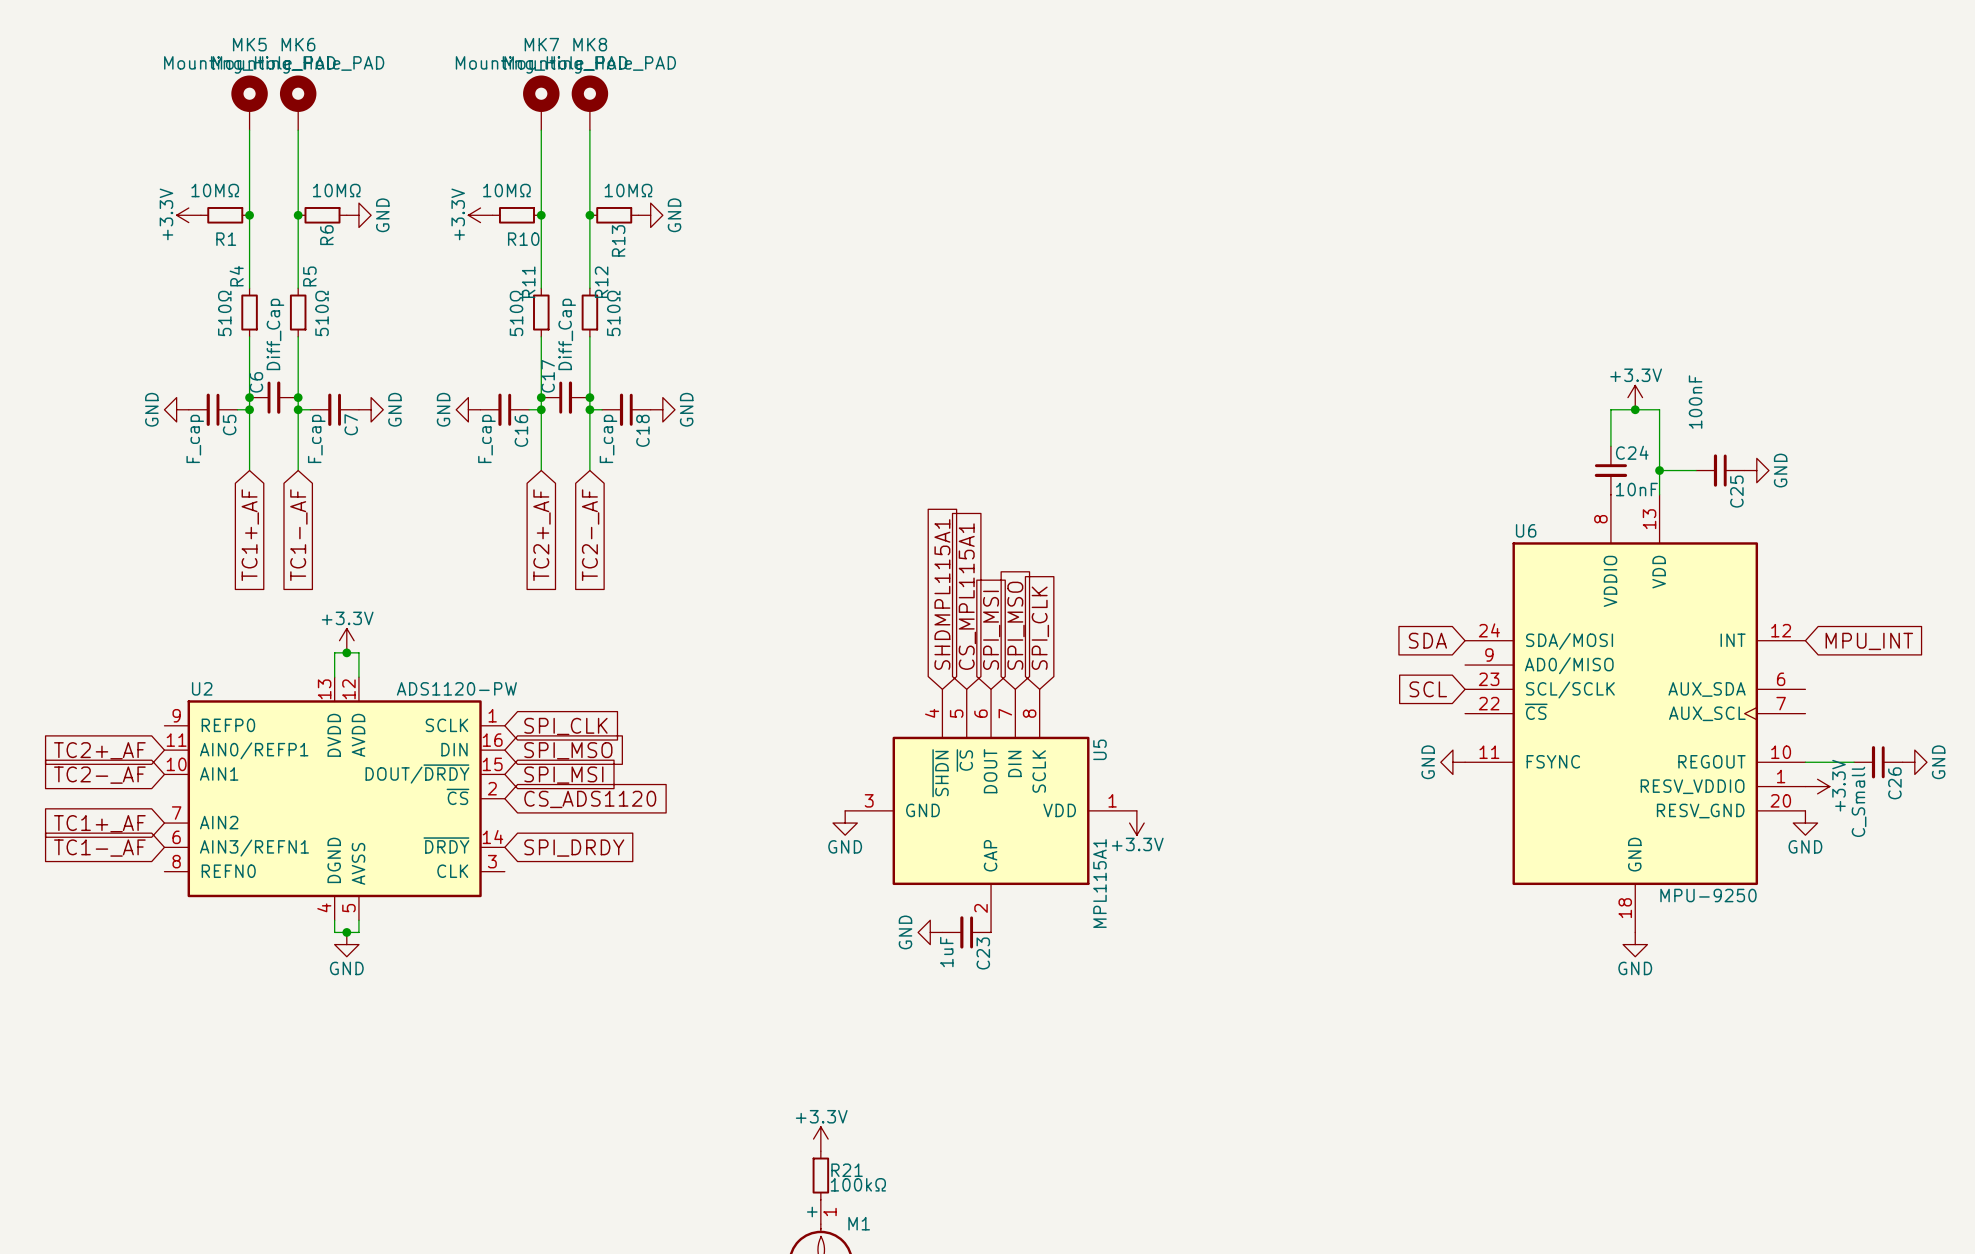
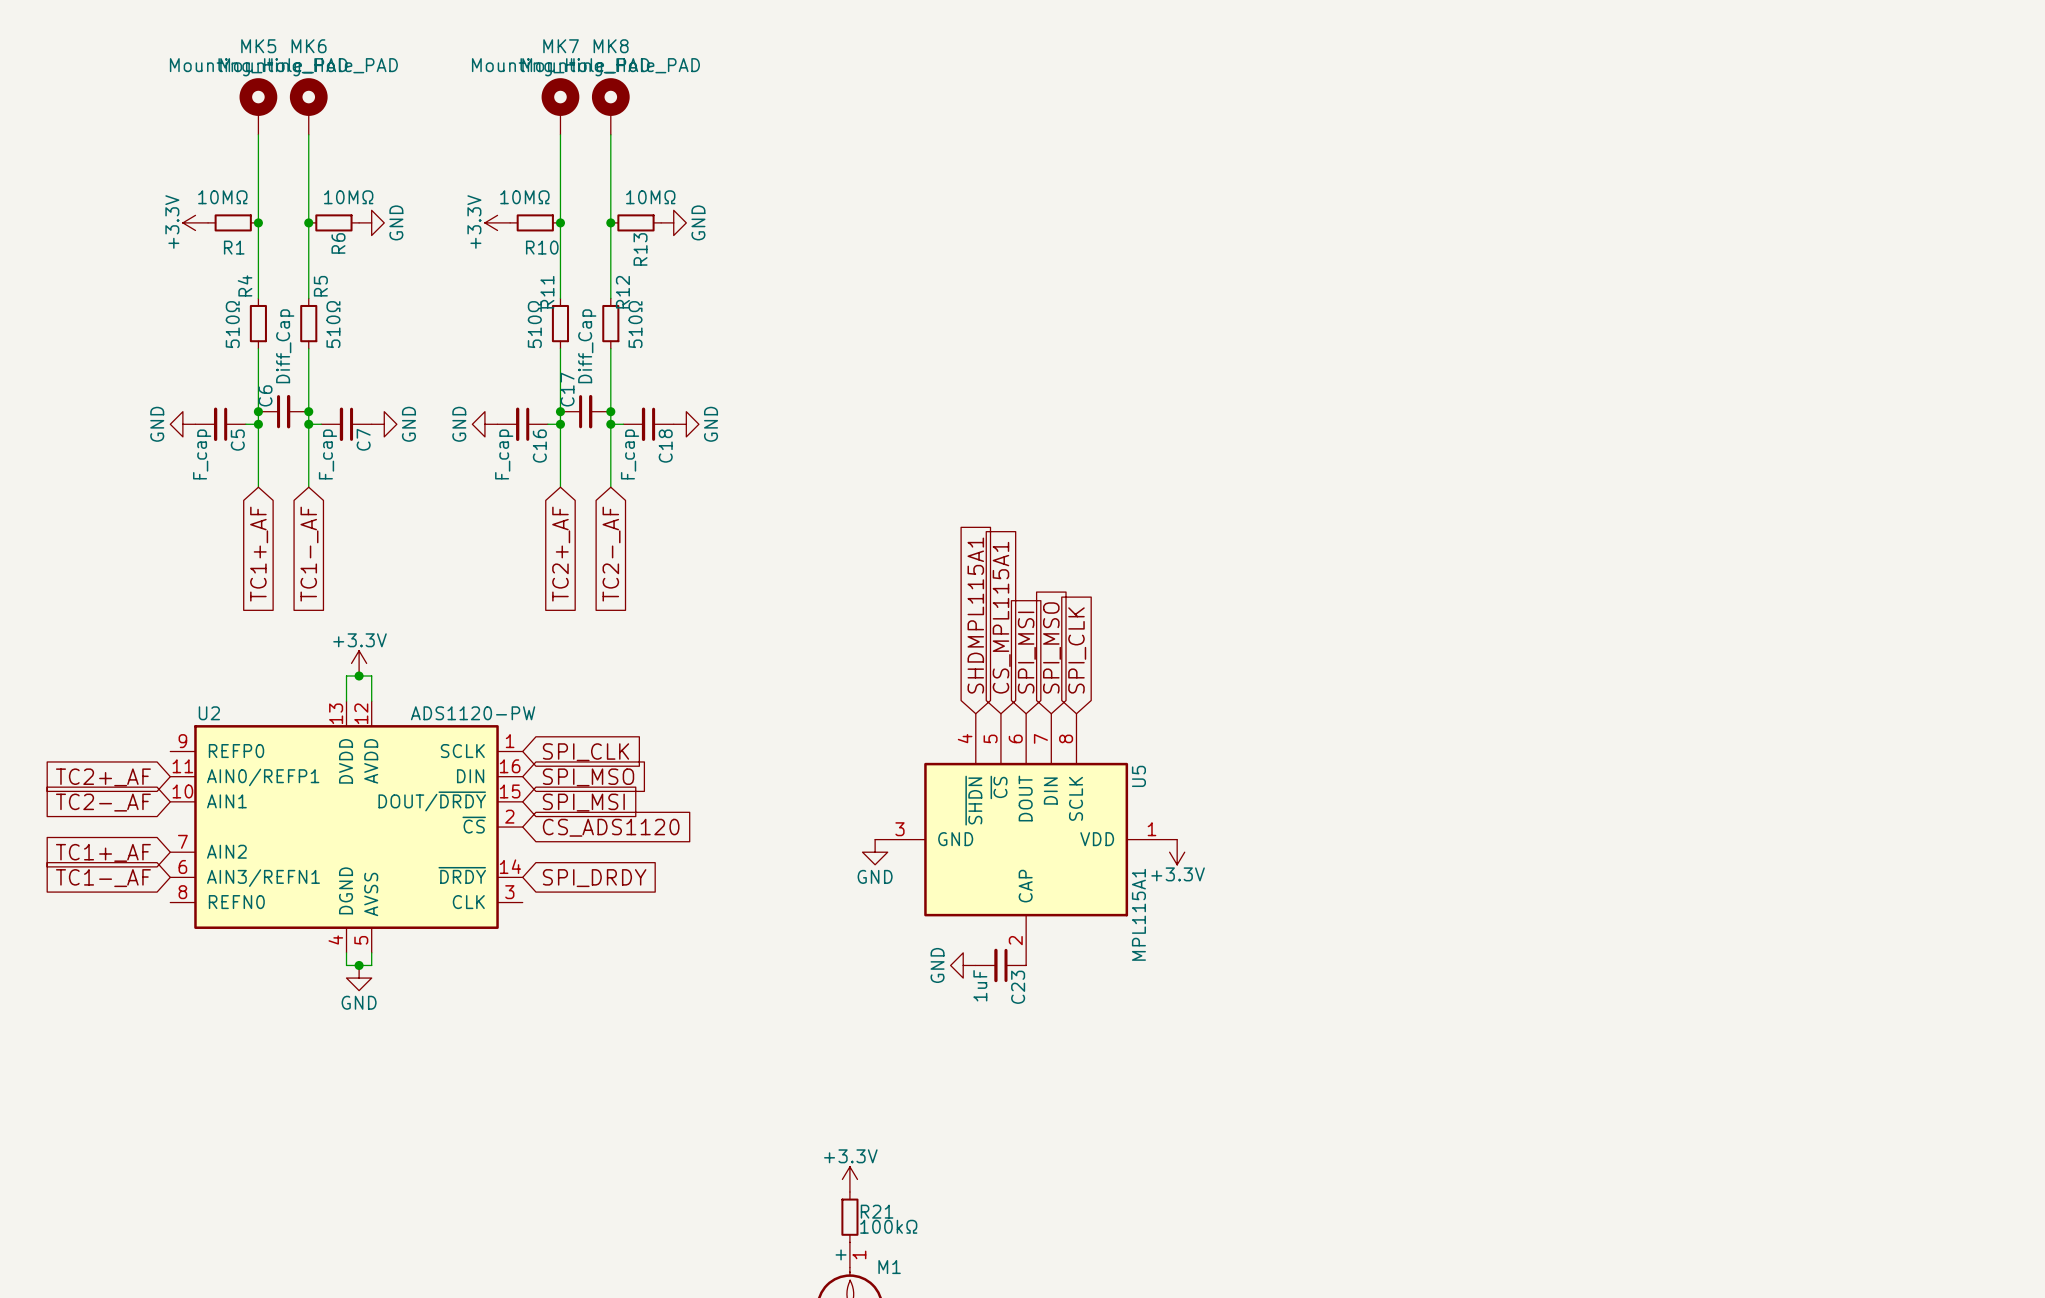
power symbol: +3.3V (1635, 397) -> none
junction: (1635, 409) -> none
wire: (1610, 446) (1610, 409) (1659, 409) (1659, 494) -> none
C24: 10nF (1610, 470) -> none
wire: (1659, 470) (1696, 470) -> none
junction: (1659, 470) -> none
C25: 100nF (1720, 470) -> none
power symbol: GND (1756, 470) -> none
global label: SDA (1427, 640) -> none
global label: MPU_INT (1869, 641) -> none
global label: SCL (1428, 689) -> none
U6: MPU-9250 (1635, 713) -> none
power symbol: GND (1452, 762) -> none
wire: (1805, 762) (1854, 762) -> none
C26: C_Small (1878, 762) -> none
power symbol: GND (1914, 762) -> none
power symbol: +3.3V (1817, 786) -> none
power symbol: GND (1805, 823) -> none
power symbol: GND (1635, 944) -> none

